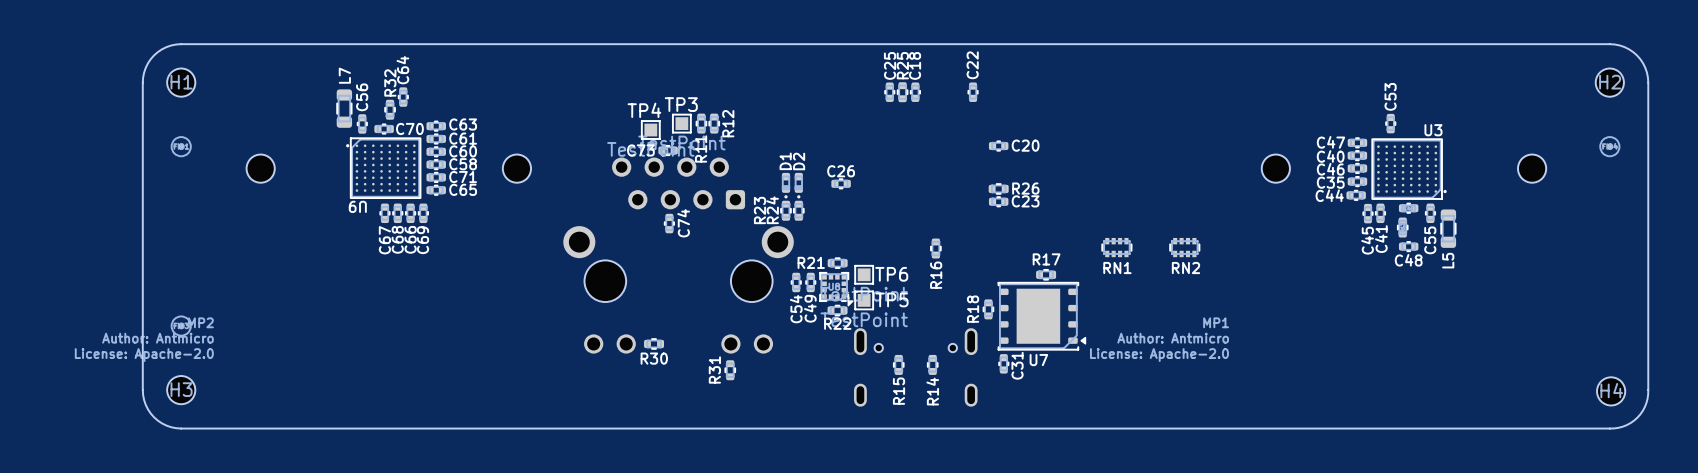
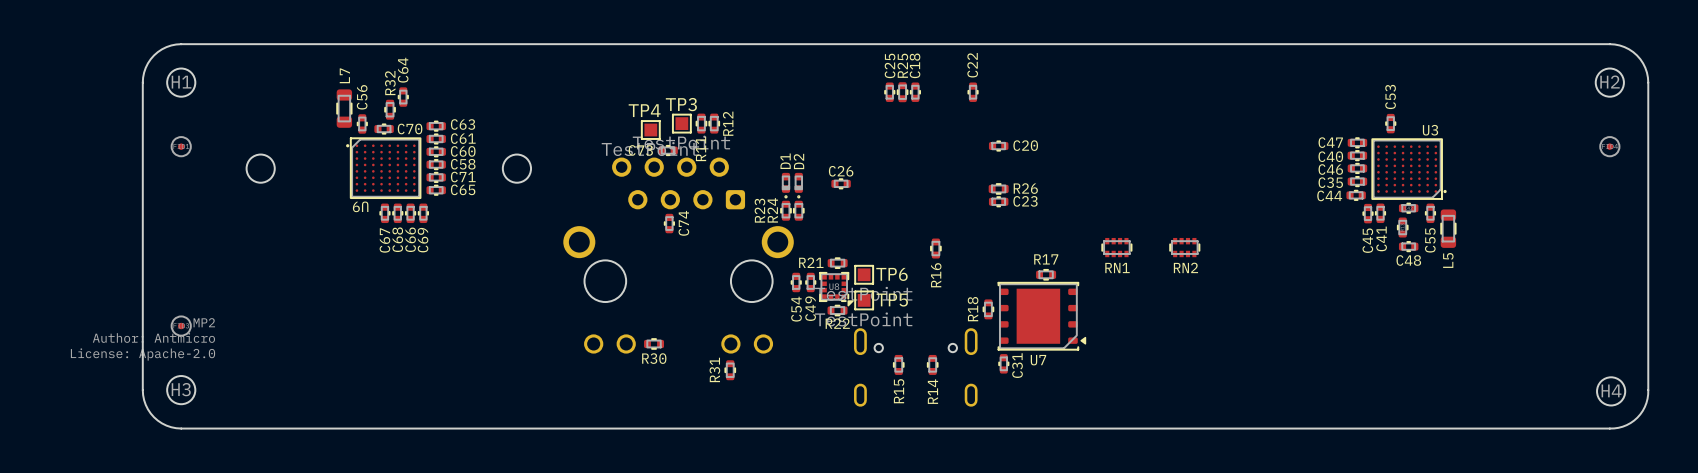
MP1: (1403, 168) -> none

